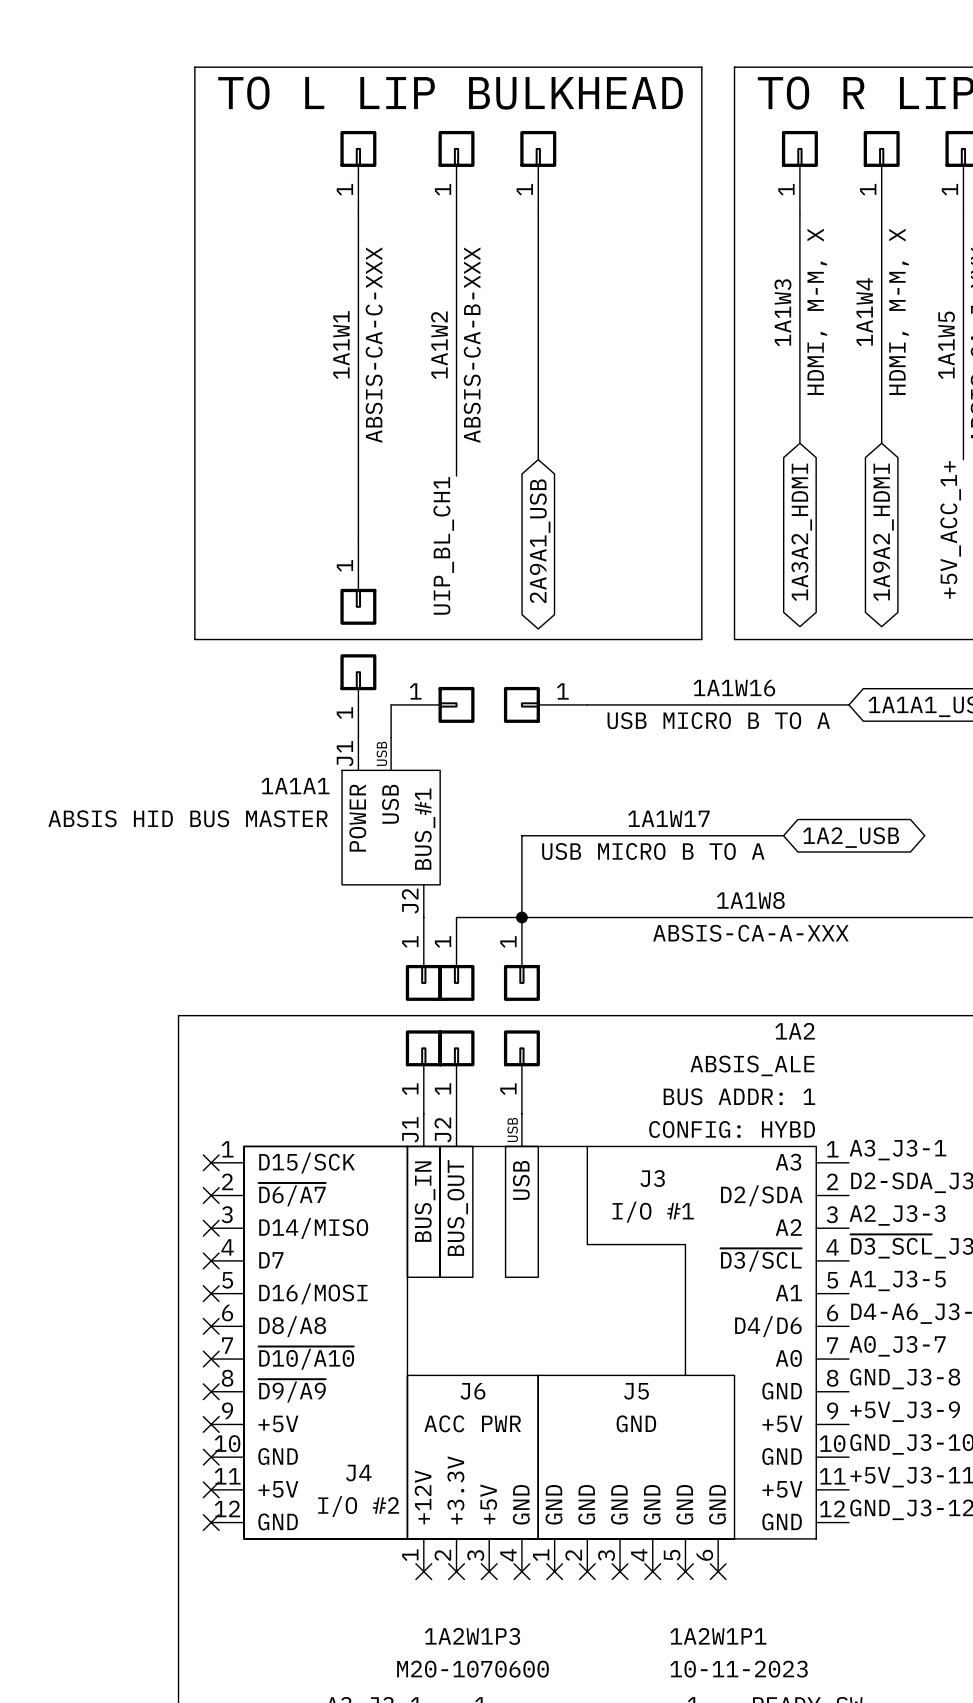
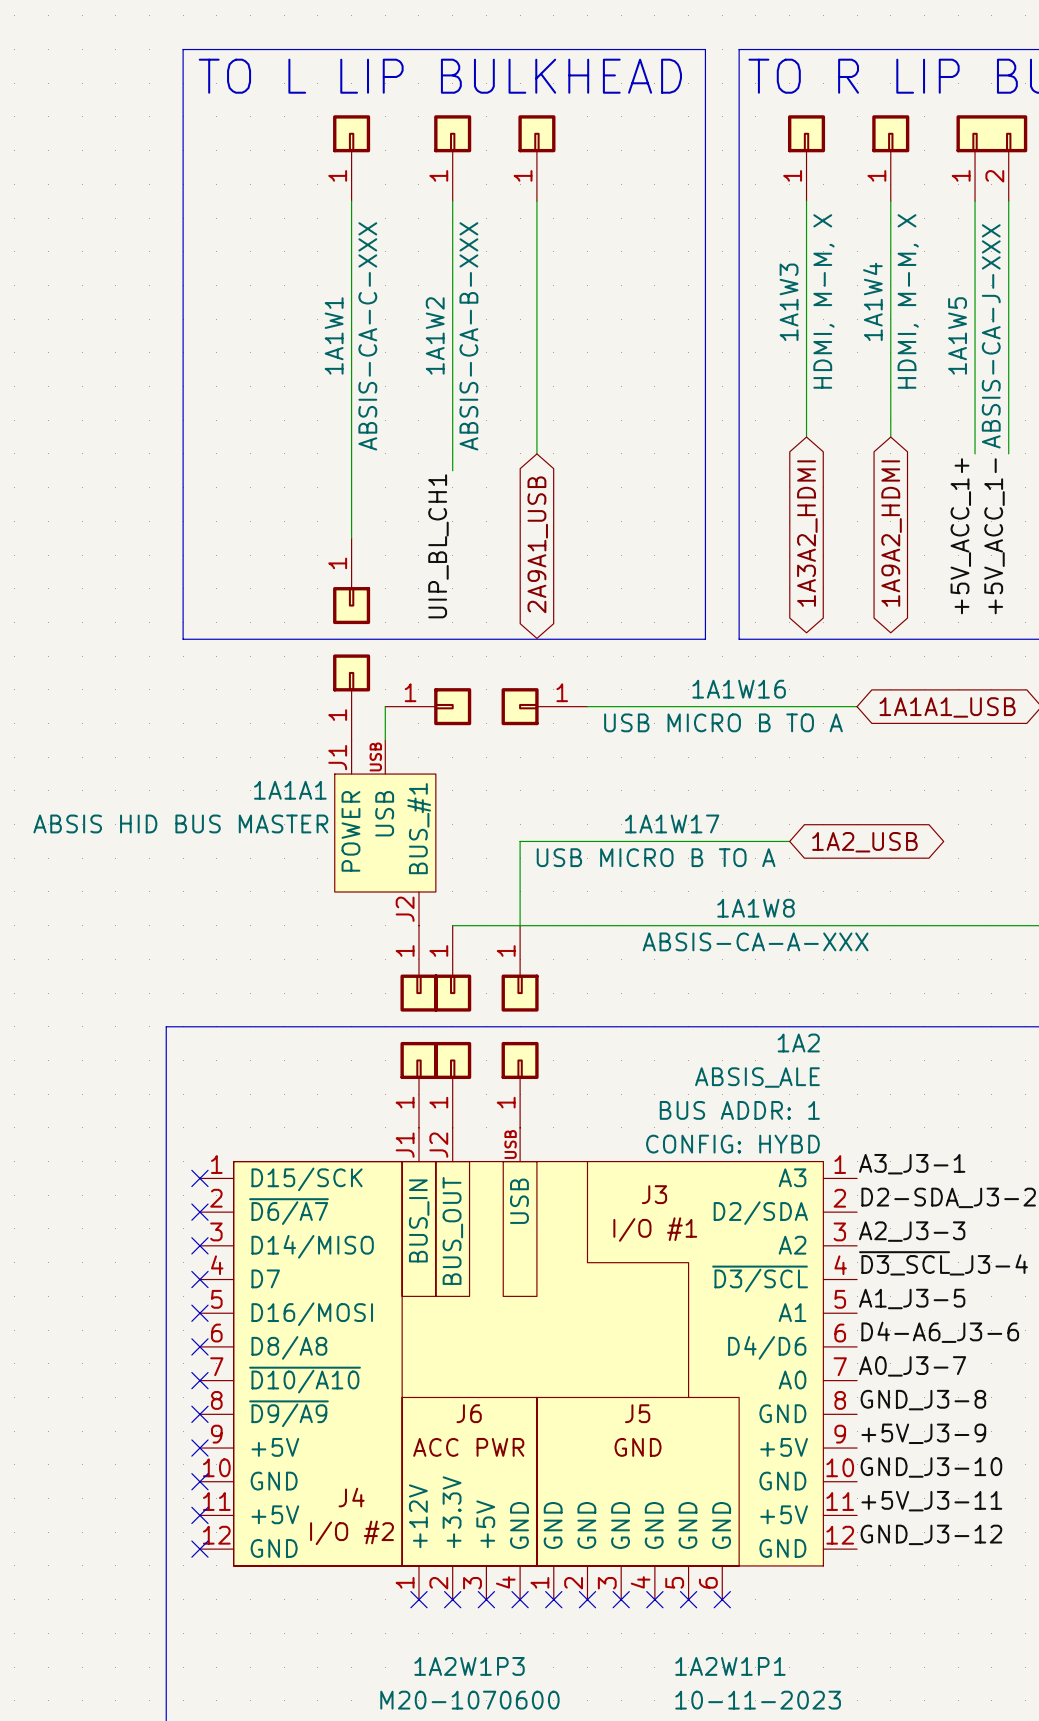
junction: (521, 917) -> none

